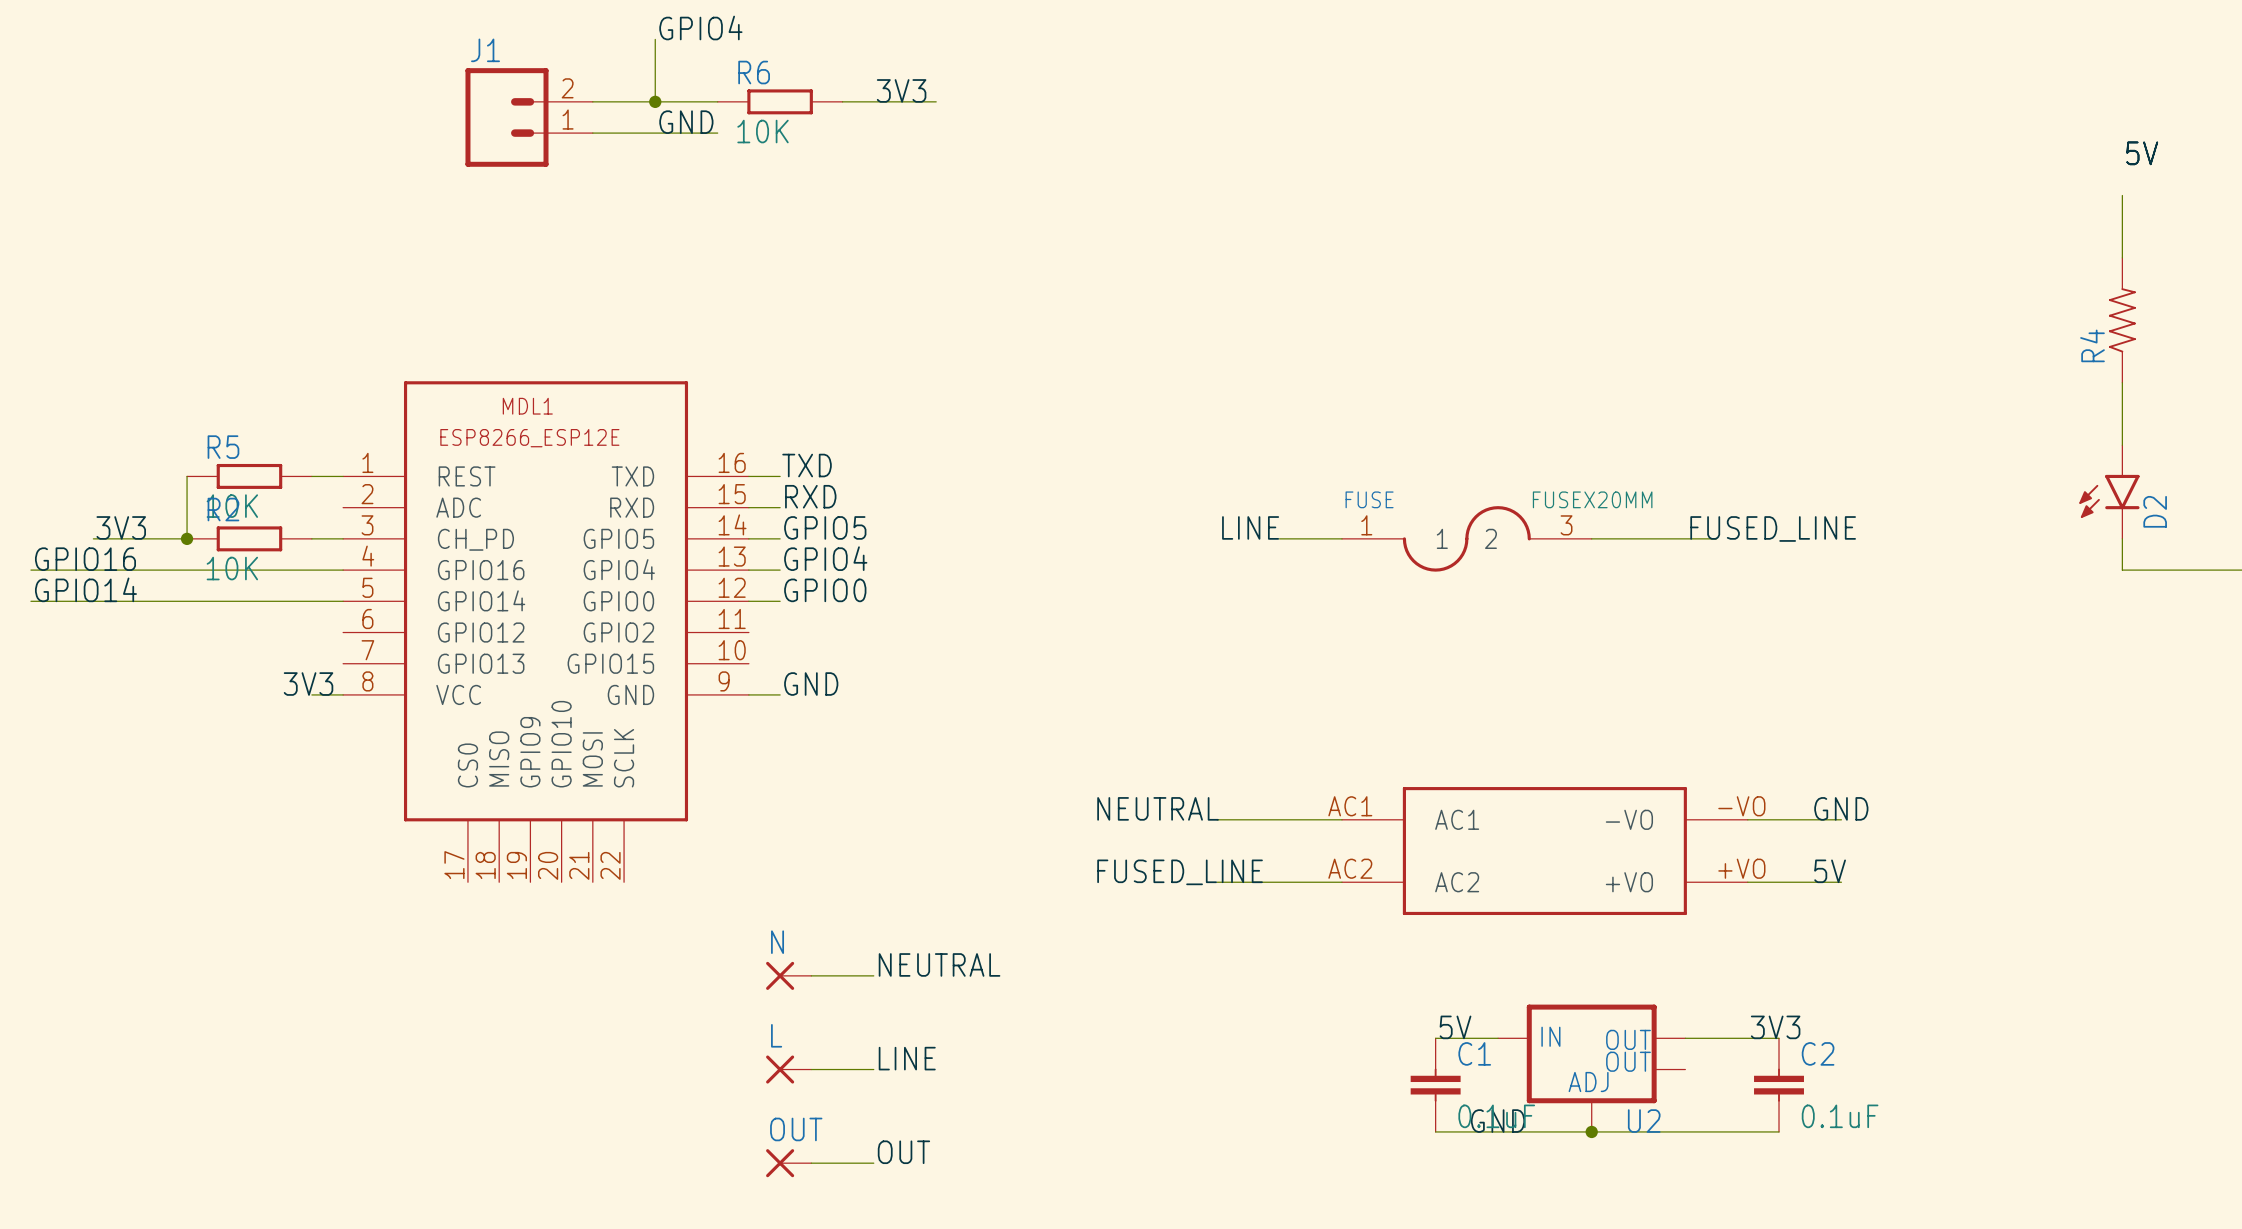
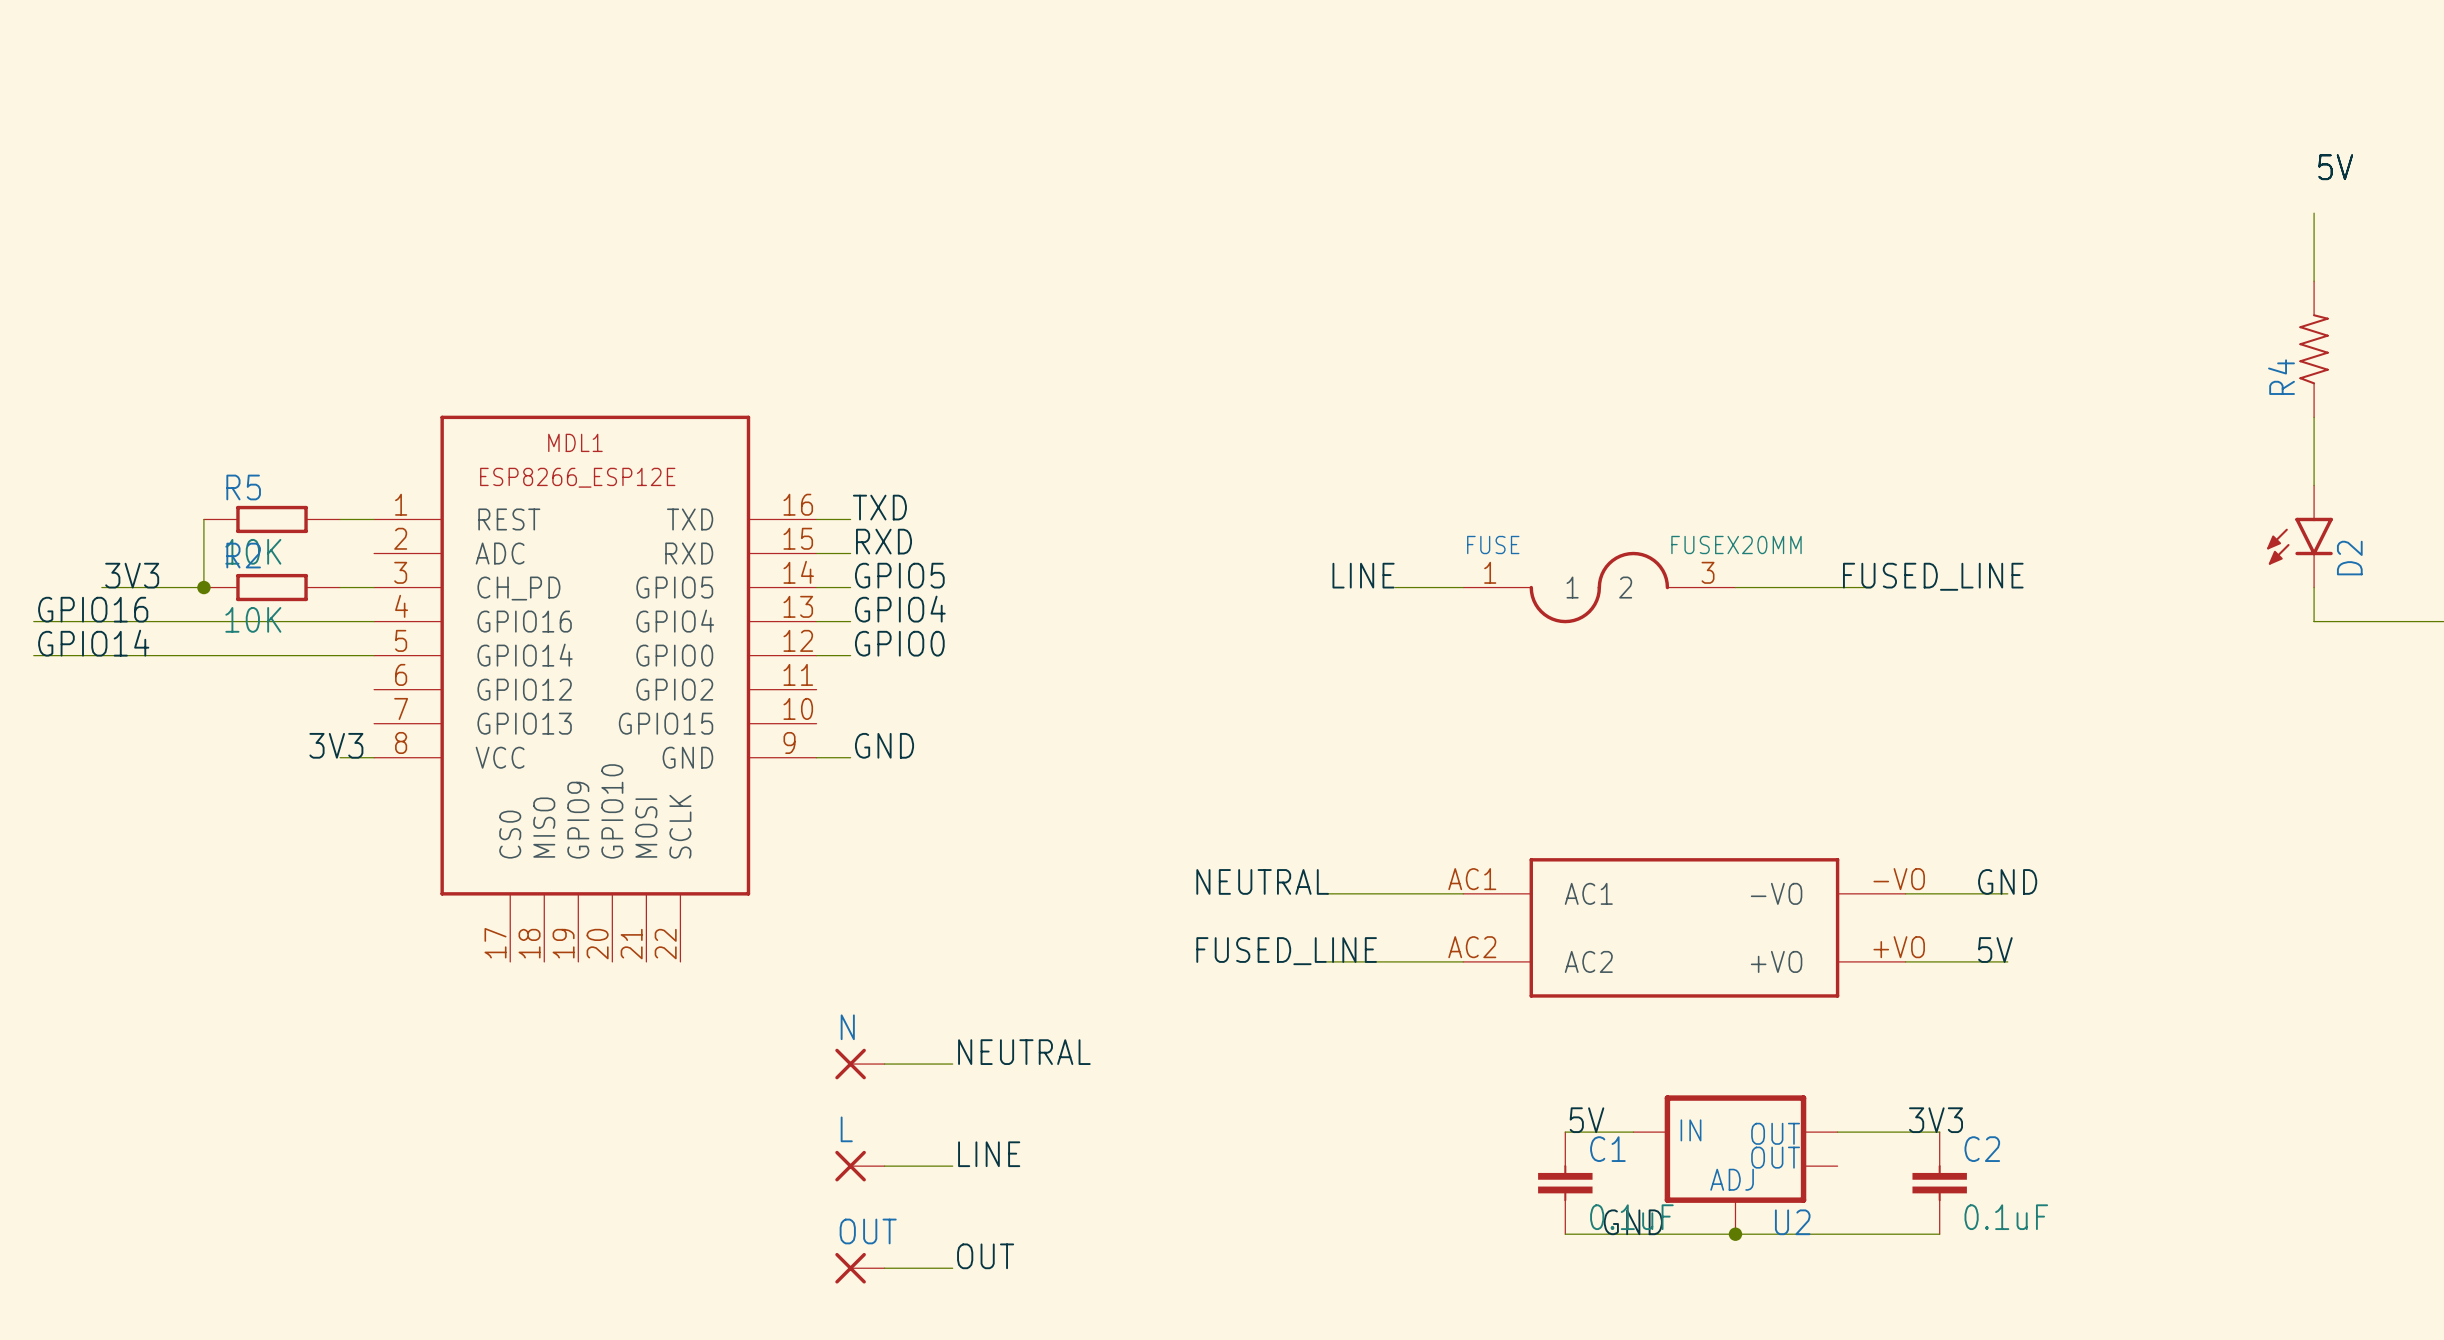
label: GPIO4 (700, 27) -> none
wire: (655, 39) (655, 101) -> none
label: 3V3 (901, 90) -> none
wire: (592, 101) (717, 101) -> none
junction: (655, 101) -> none
R6: 10K (780, 101) -> none
wire: (842, 101) (936, 101) -> none
J1: (529, 117) -> none
label: GND (686, 122) -> none
wire: (592, 133) (717, 133) -> none

